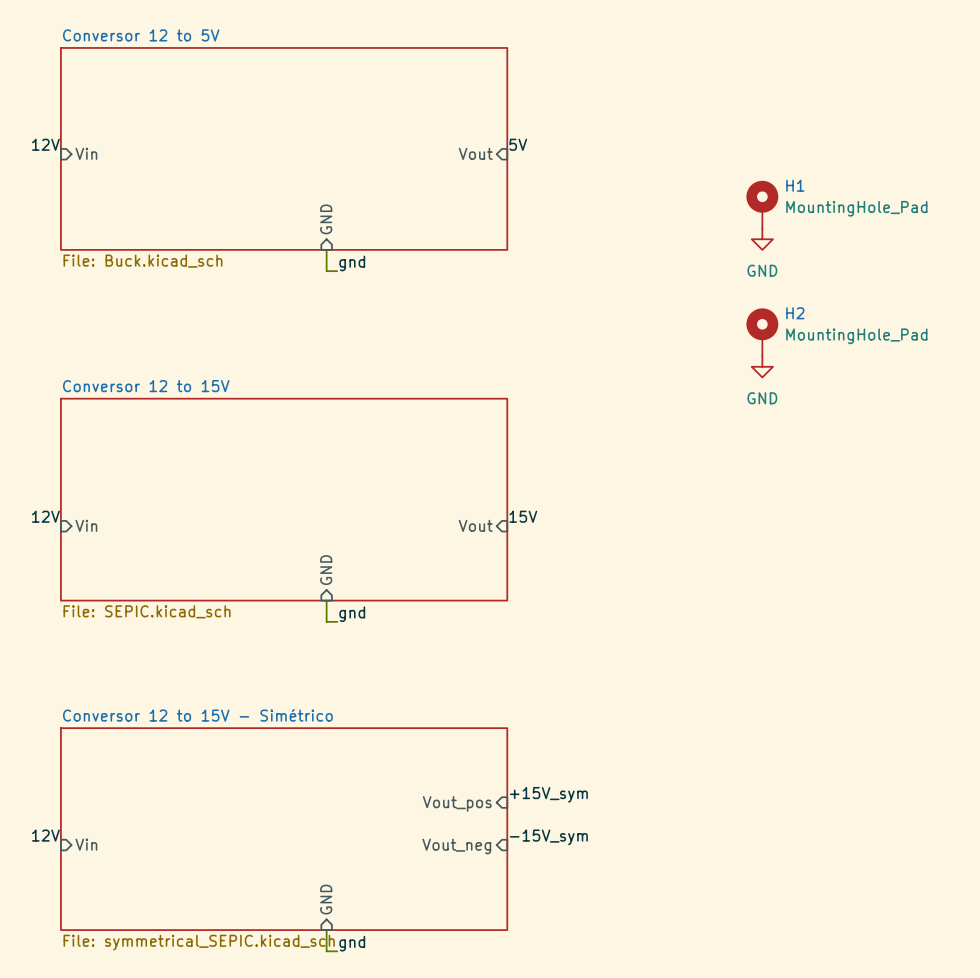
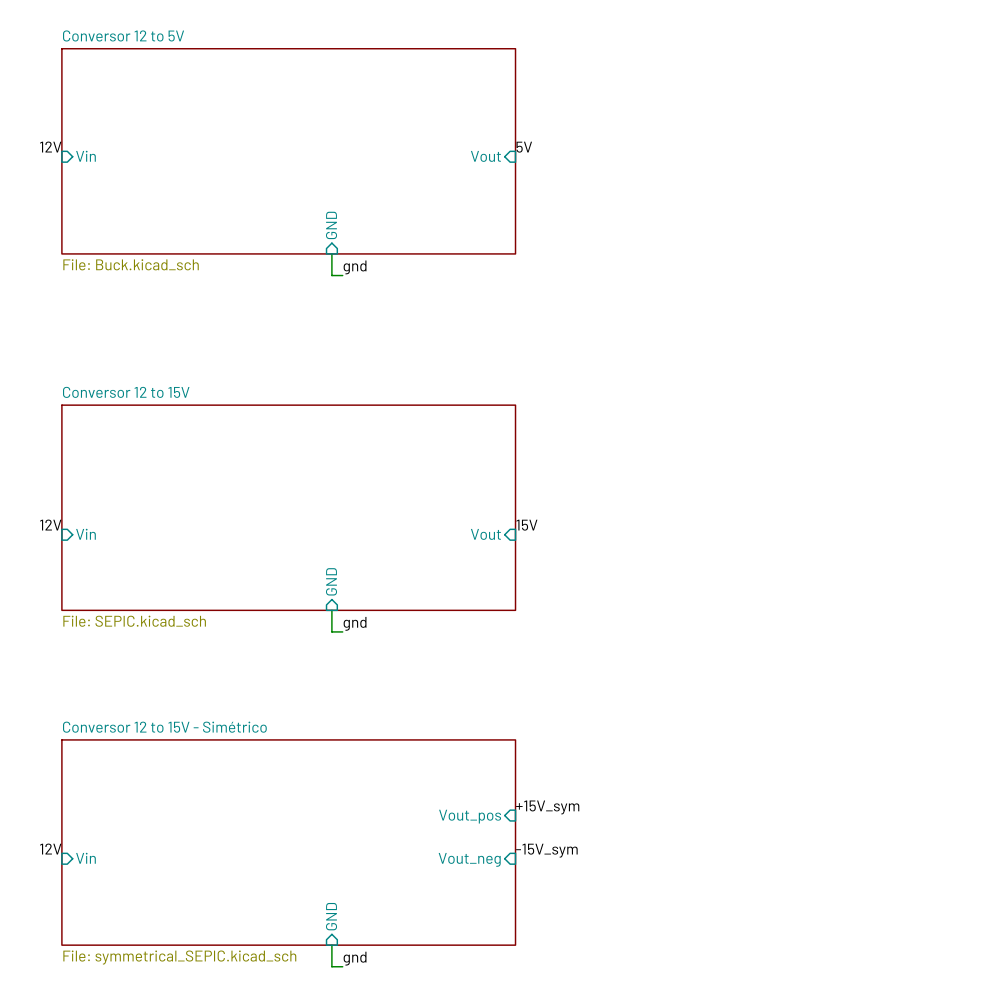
H1: MountingHole_Pad (762, 204) -> none
power symbol: GND (762, 239) -> none
H2: MountingHole_Pad (762, 332) -> none
power symbol: GND (762, 366) -> none

